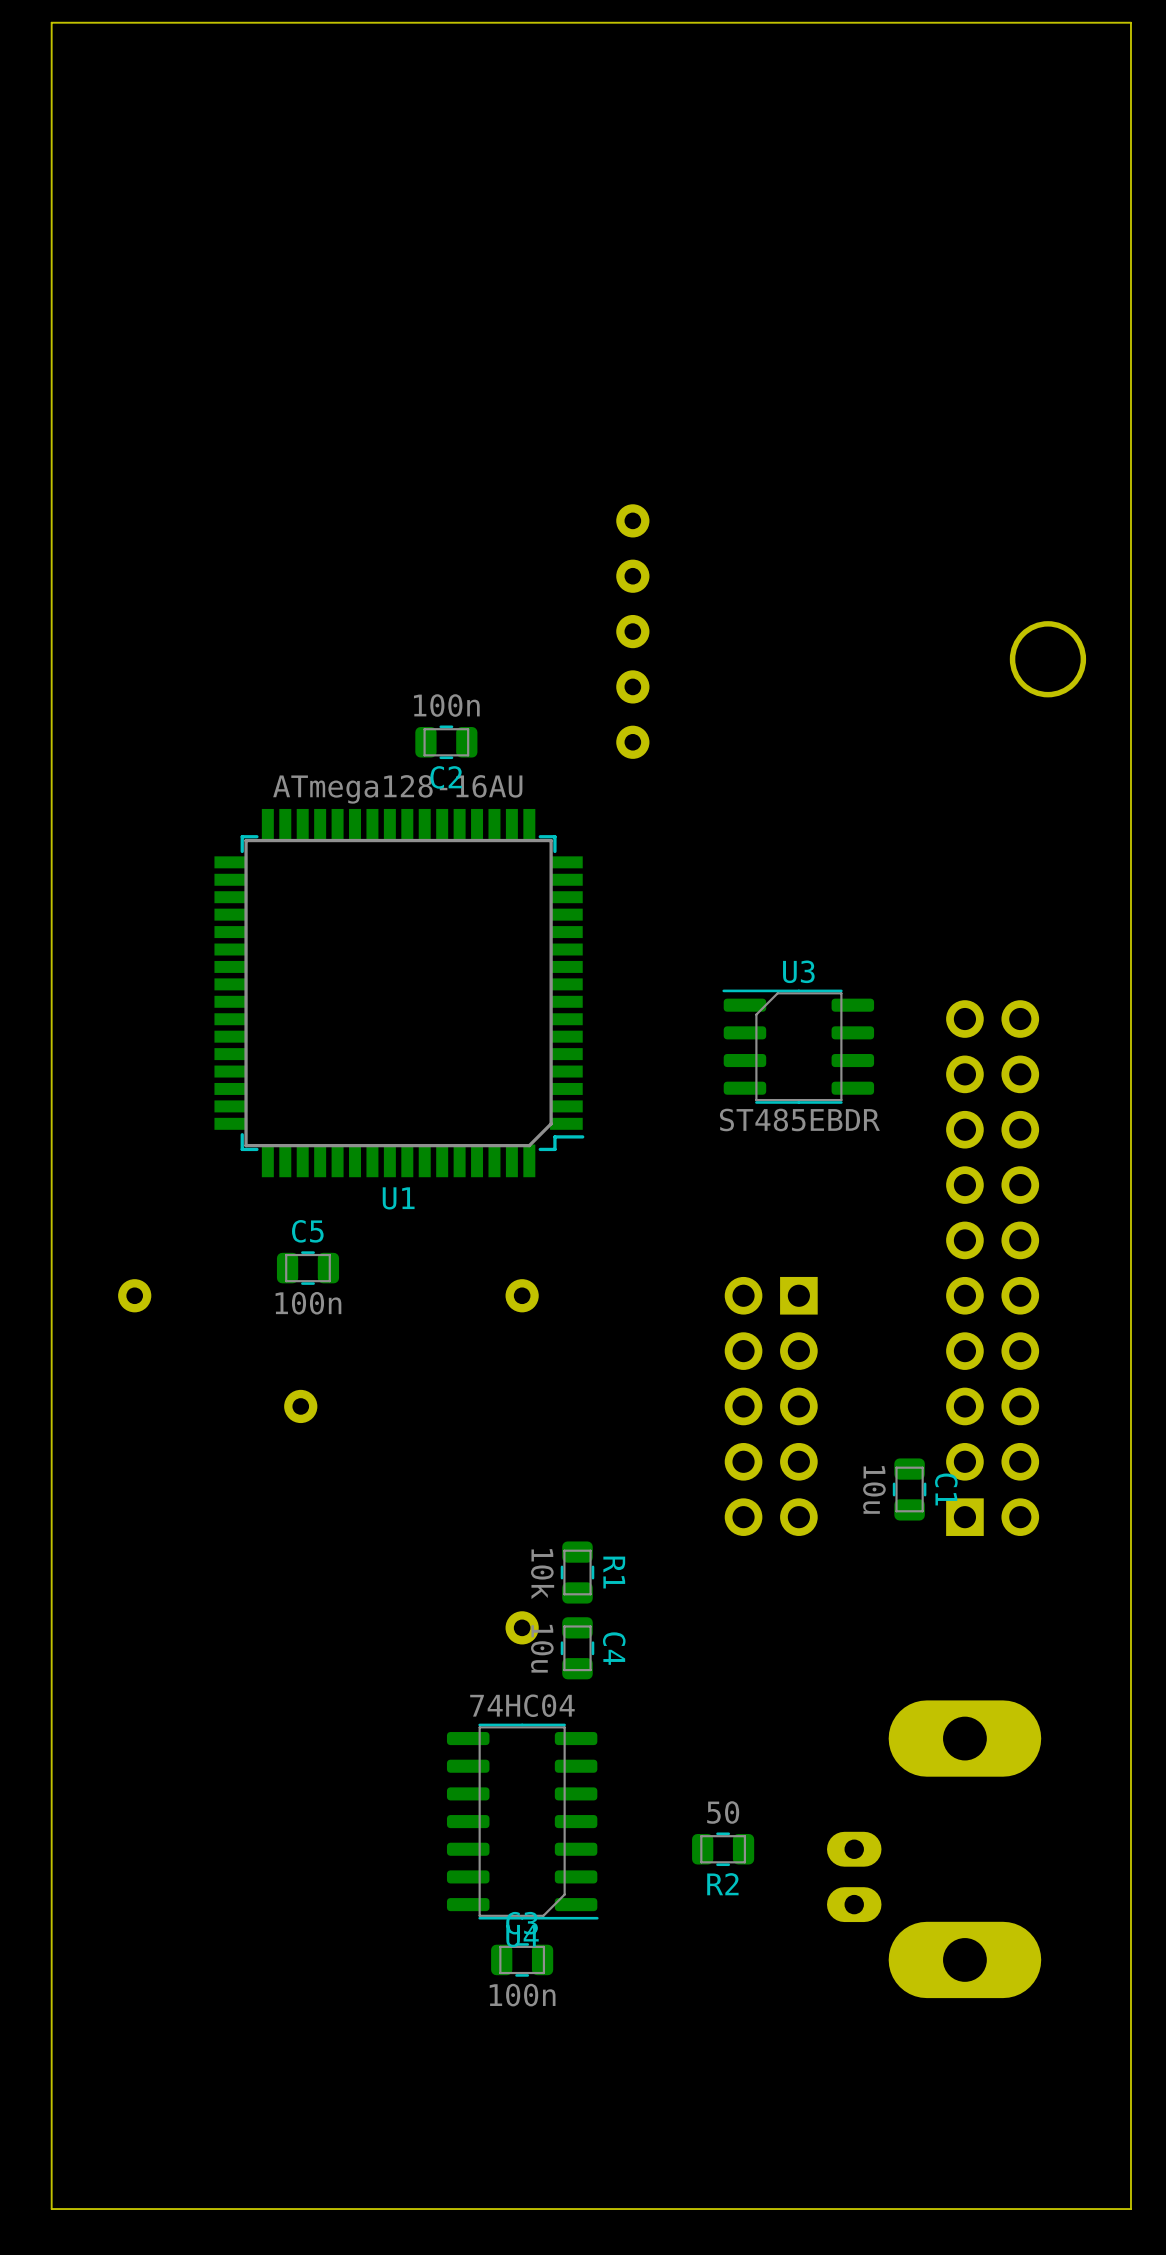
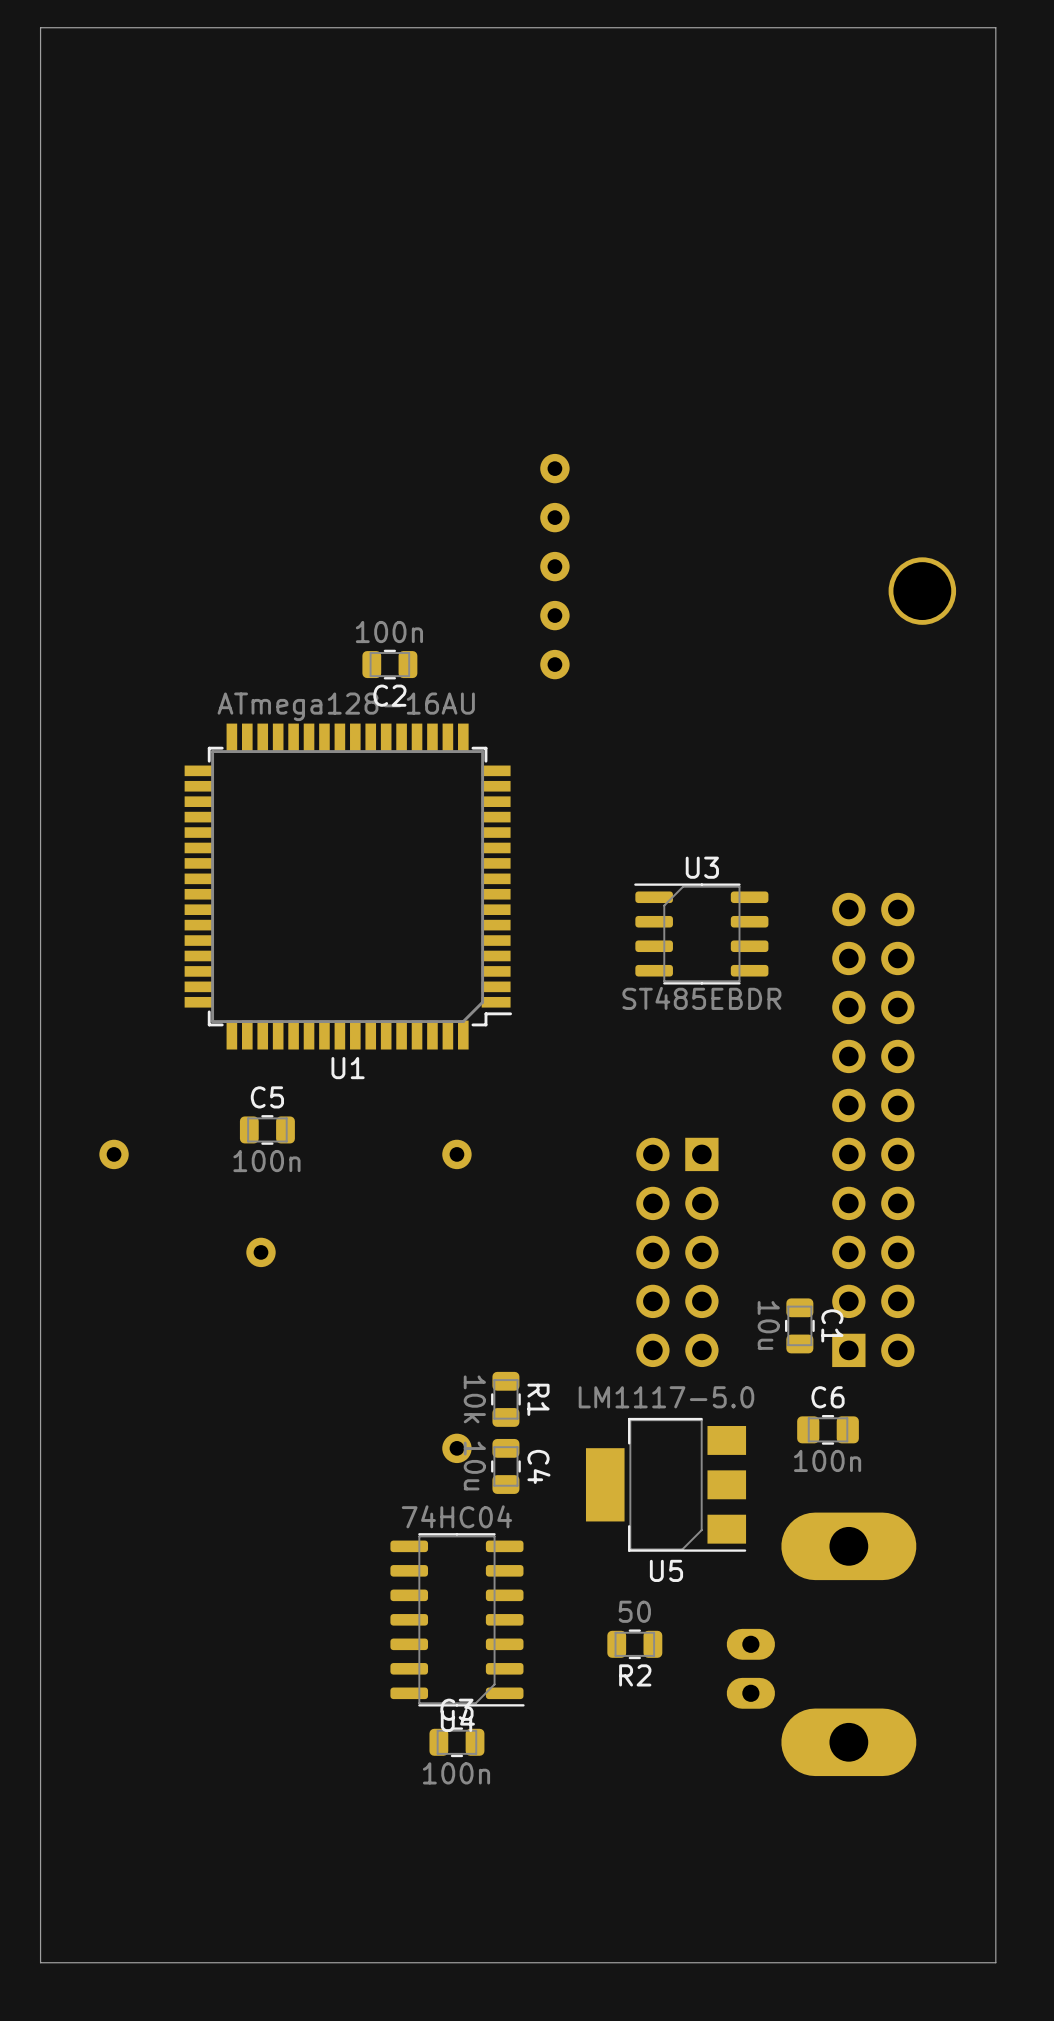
C6: none -> 100n (828, 1429)
U5: none -> LM1117-5.0 (666, 1484)

